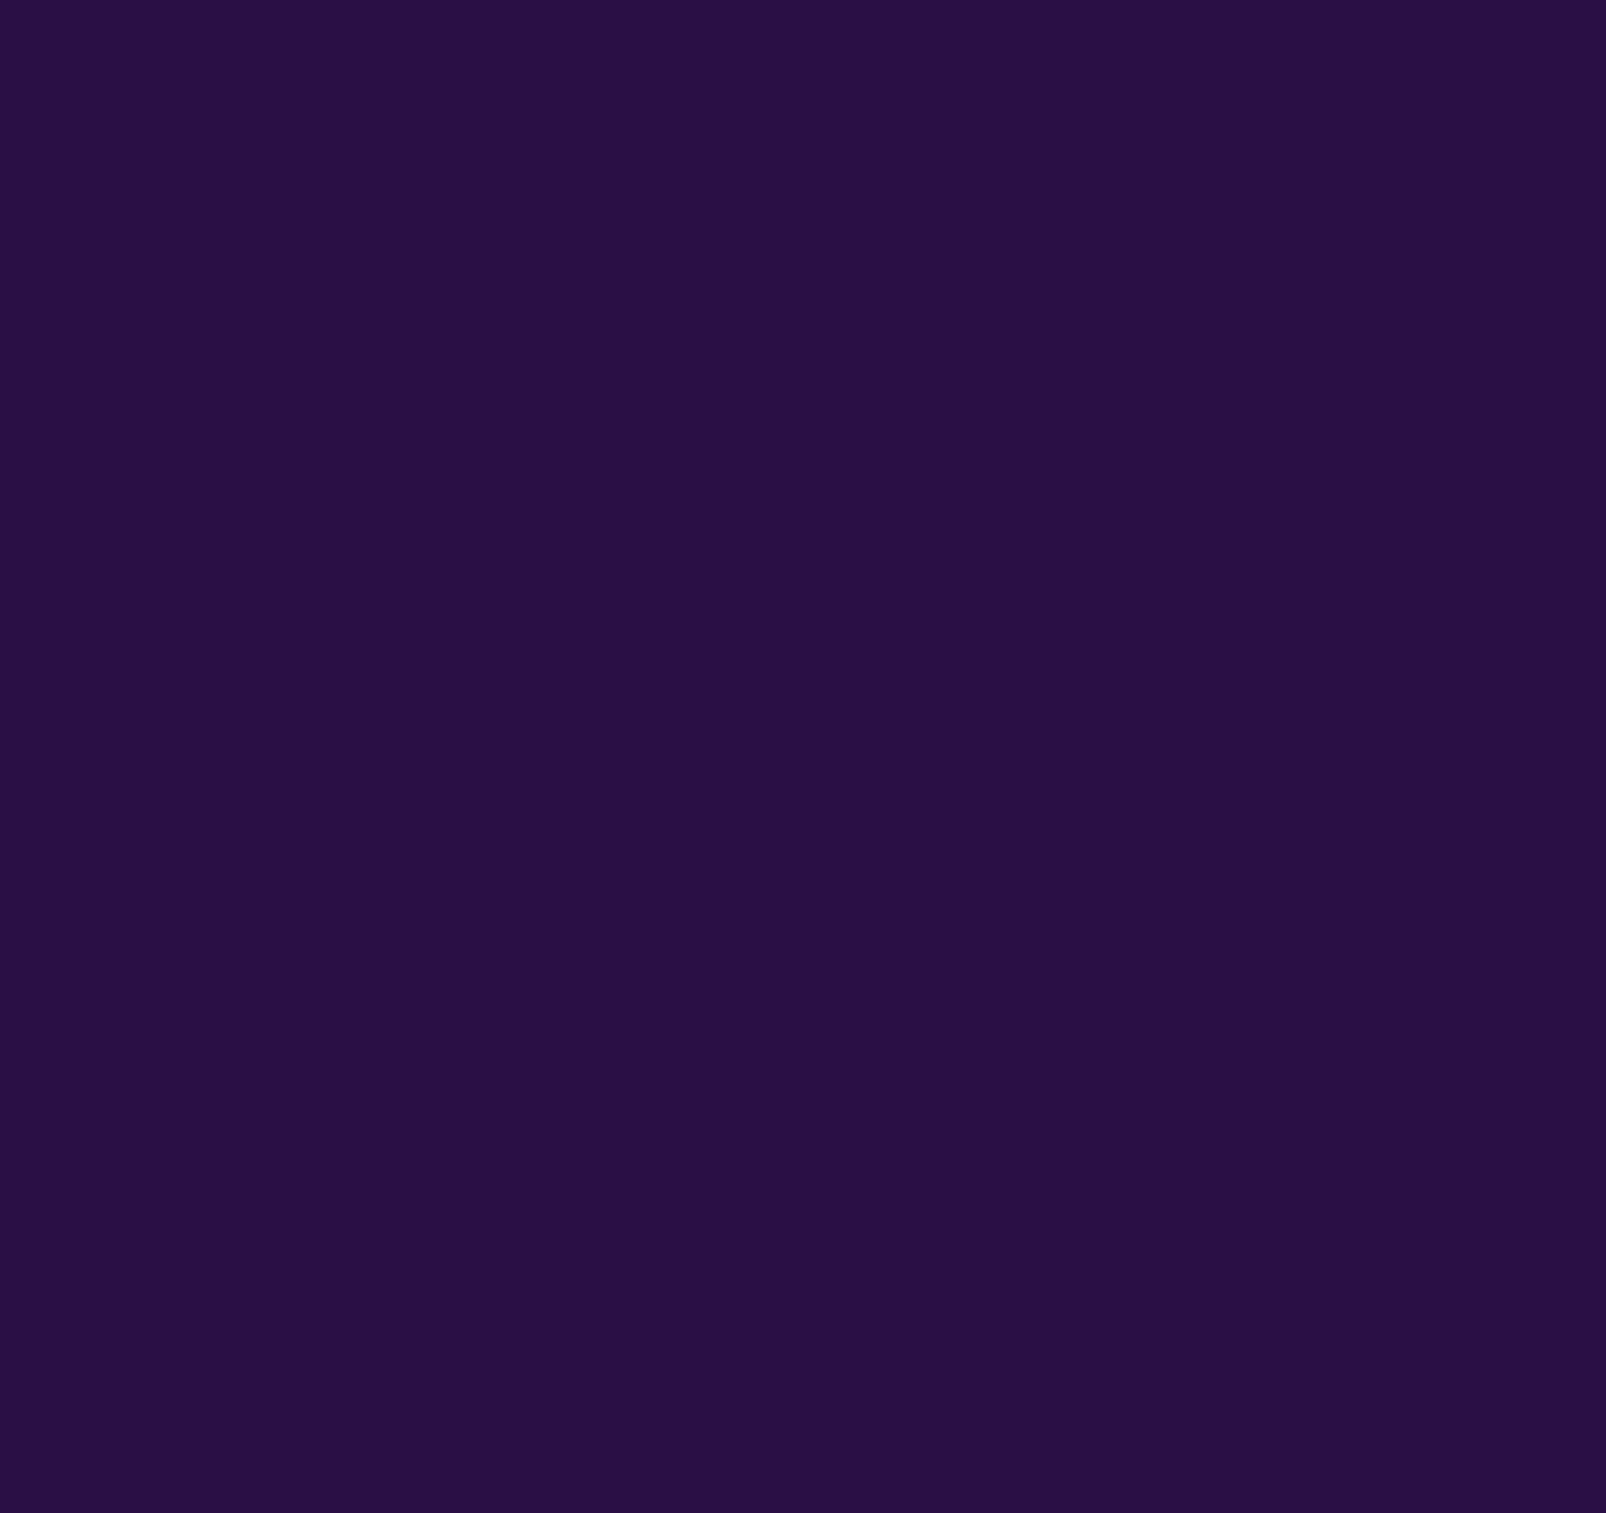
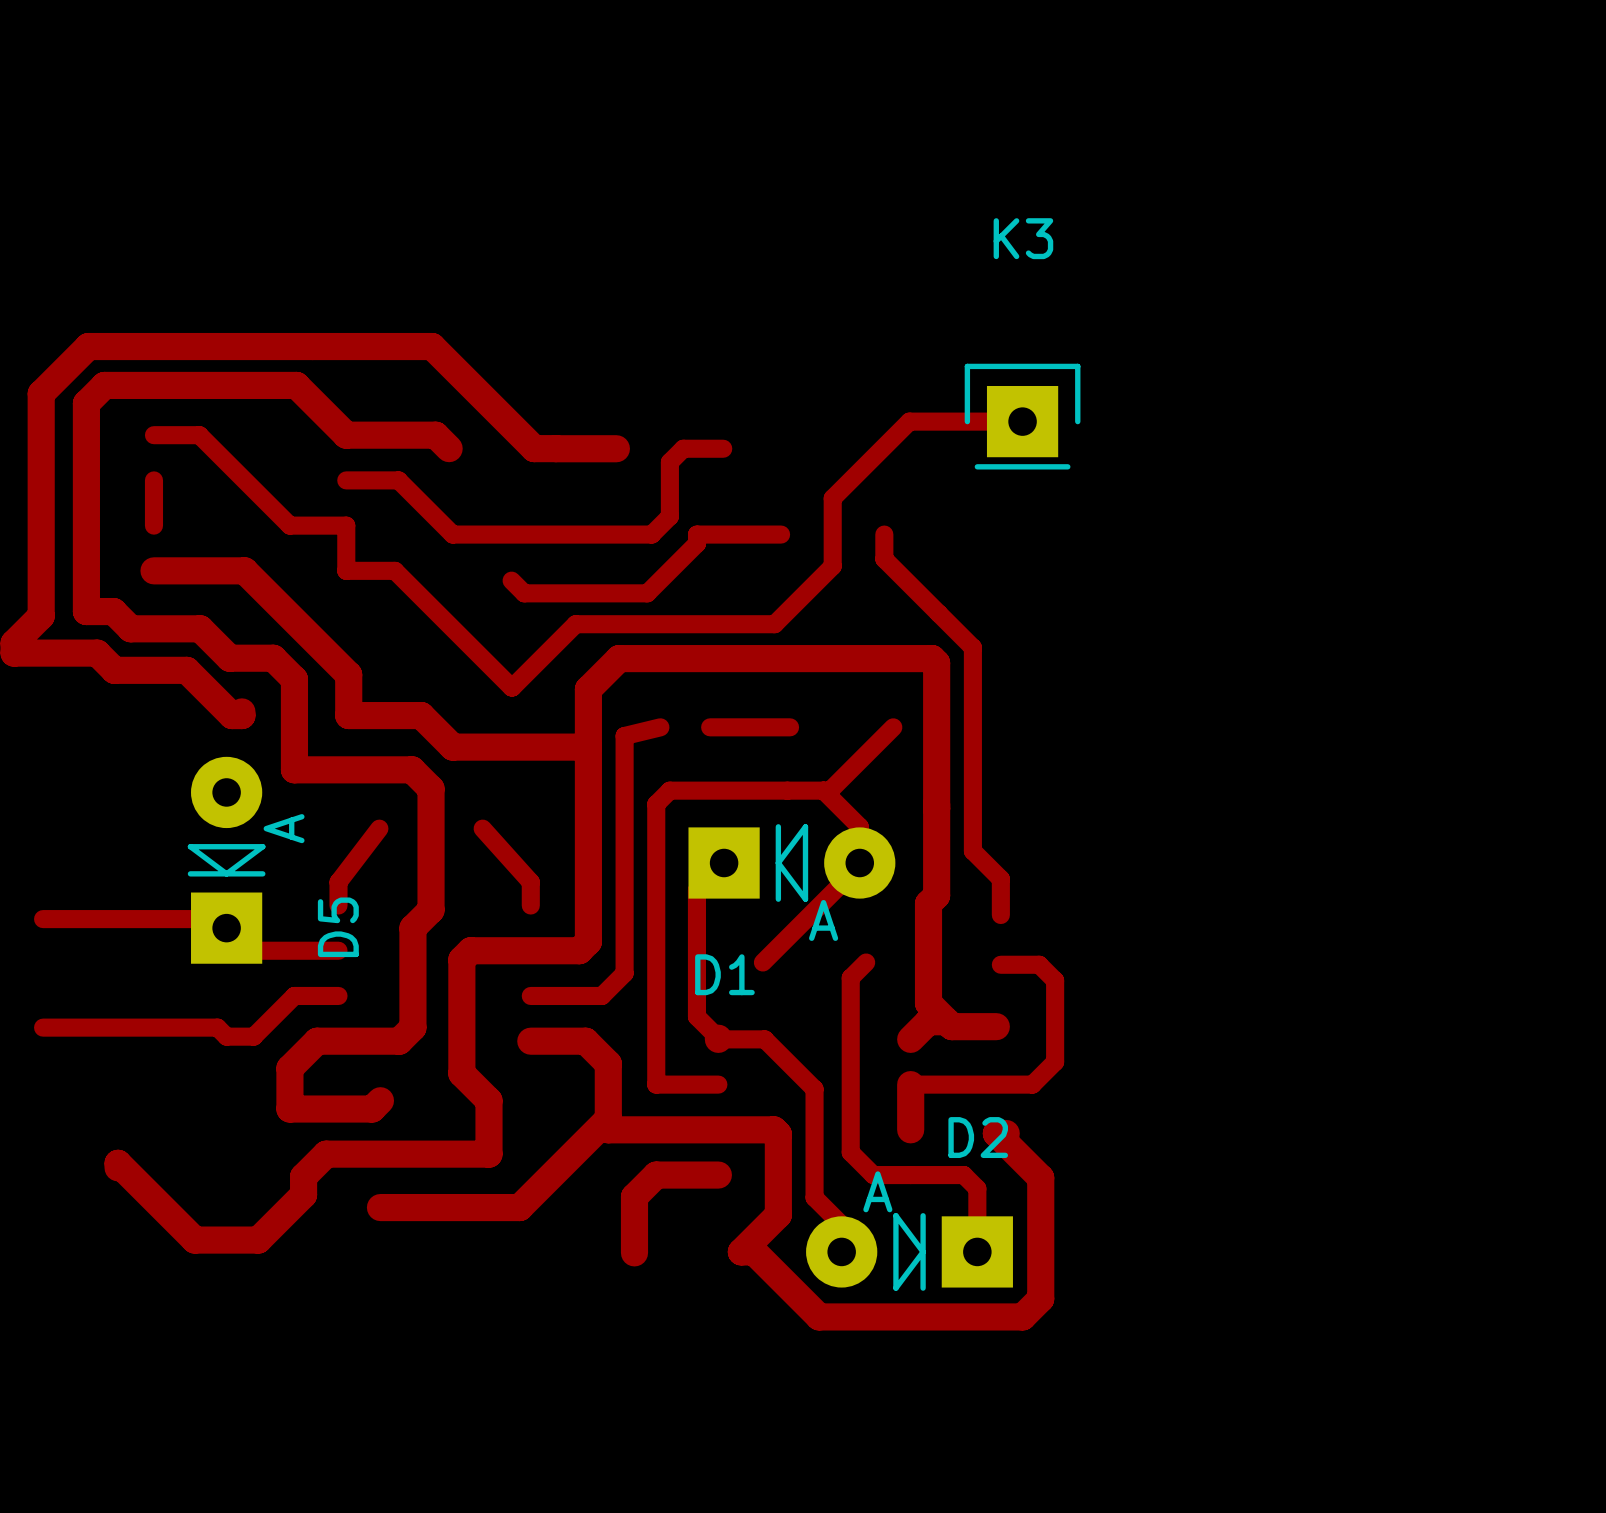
K3: none -> (1022, 416)
track: none -> (1022, 421) (909, 421) (832, 498) (832, 566) (774, 624) (575, 624) (512, 687) (394, 570) (346, 570) (346, 525) (289, 525) (199, 435) (153, 435)
track: none -> (449, 448) (435, 435) (346, 435) (296, 385) (104, 385) (86, 403) (86, 611) (113, 611) (130, 628) (200, 628) (229, 658) (273, 658) (294, 679) (294, 769) (412, 769) (431, 788) (431, 910) (412, 928) (412, 1027) (399, 1041) (317, 1041) (289, 1068) (289, 1109) (372, 1109) (380, 1100)
track: none -> (616, 448) (534, 448) (432, 346) (88, 346) (41, 393) (41, 616) (14, 643) (14, 653) (97, 653) (114, 670) (186, 670) (232, 715) (241, 715) (241, 711)
track: none -> (723, 448) (683, 448) (669, 462) (669, 516) (651, 534) (452, 534) (398, 480) (346, 480)
track: none -> (153, 480) (153, 525)
track: none -> (781, 534) (697, 534) (697, 543) (647, 593) (524, 593) (511, 580)
track: none -> (884, 534) (884, 559) (972, 647) (972, 851) (1000, 879) (1000, 915)
track: none -> (153, 570) (244, 570) (348, 674) (348, 715) (421, 715) (452, 747) (588, 747)
track: none -> (660, 727) (624, 736) (624, 973) (601, 995) (530, 995)
track: none -> (710, 727) (790, 727)
track: none -> (893, 727) (829, 790) (669, 790) (656, 804) (656, 1084) (718, 1084)
track: none -> (823, 790) (859, 826) (859, 865) (762, 962)
track: none -> (379, 828) (338, 882) (338, 905)
track: none -> (482, 828) (530, 882) (530, 905)
D5: none -> (226, 860)
track: none -> (724, 863) (696, 890) (696, 1016) (718, 1039) (764, 1039) (814, 1089) (814, 1197) (841, 1224) (841, 1251)
D1: none -> (791, 863)
track: none -> (43, 919) (217, 919) (249, 950) (338, 950)
track: none -> (866, 962) (850, 977) (850, 1152) (873, 1175) (963, 1175) (977, 1188) (977, 1251)
track: none -> (1000, 964) (1039, 964) (1055, 980) (1055, 1061) (1032, 1084) (910, 1084) (910, 1129)
track: none -> (338, 995) (294, 995) (253, 1036) (226, 1036) (217, 1027) (43, 1027)
track: none -> (947, 1021) (928, 1021) (910, 1039)
track: none -> (996, 1026) (951, 1026) (928, 1003) (928, 903) (936, 895) (936, 663) (932, 658) (619, 658) (588, 689) (588, 941) (579, 950) (470, 950) (461, 959) (461, 1073) (489, 1100) (489, 1154) (326, 1154) (303, 1176) (303, 1194) (258, 1240) (194, 1240) (118, 1163) (118, 1167)
track: none -> (530, 1041) (585, 1041) (608, 1063) (608, 1129) (773, 1129) (778, 1134) (778, 1214) (741, 1251) (754, 1251) (819, 1316) (1022, 1316) (1040, 1298) (1040, 1177) (996, 1133) (1006, 1133)
track: none -> (608, 1118) (519, 1207) (380, 1207)
track: none -> (718, 1175) (656, 1175) (634, 1196) (634, 1252)
D2: none -> (909, 1251)

